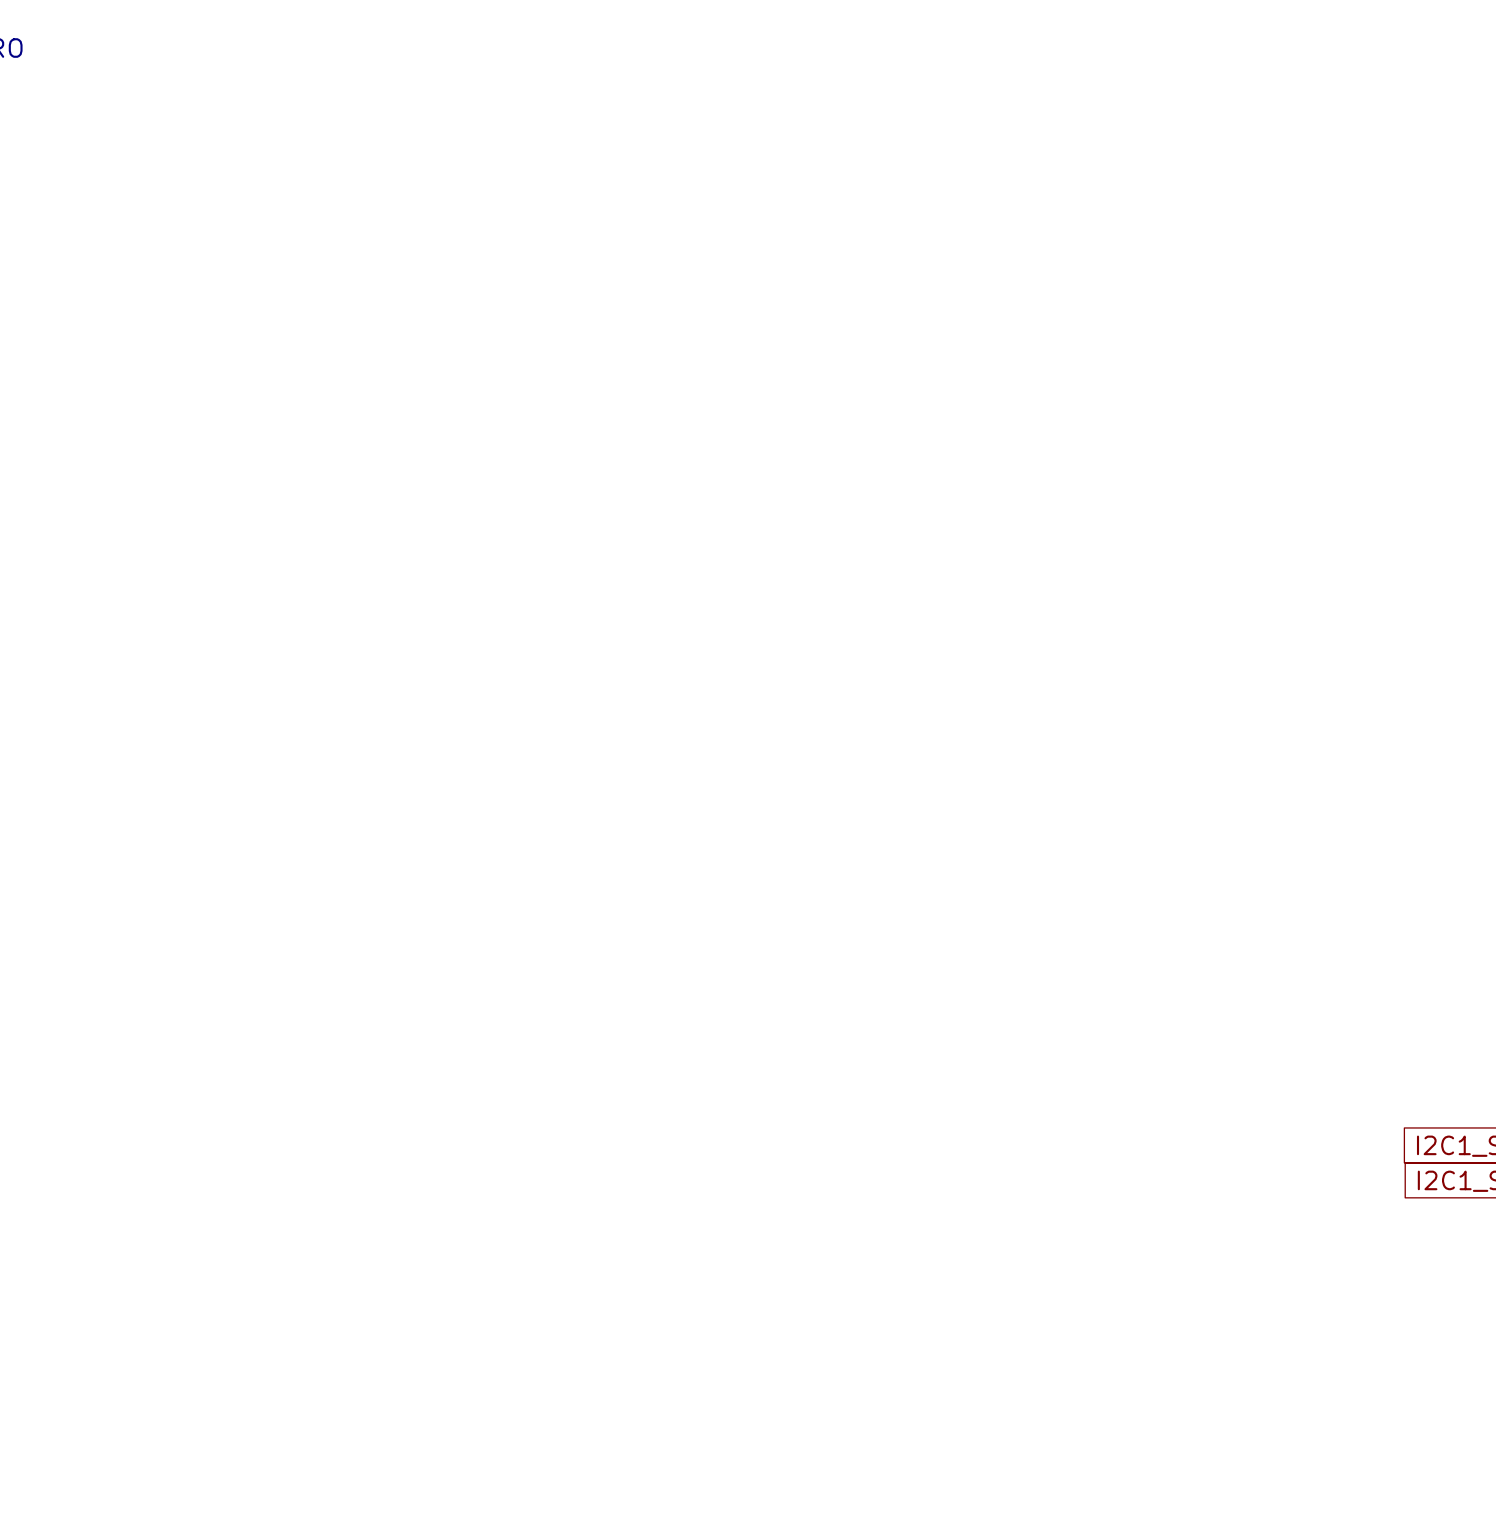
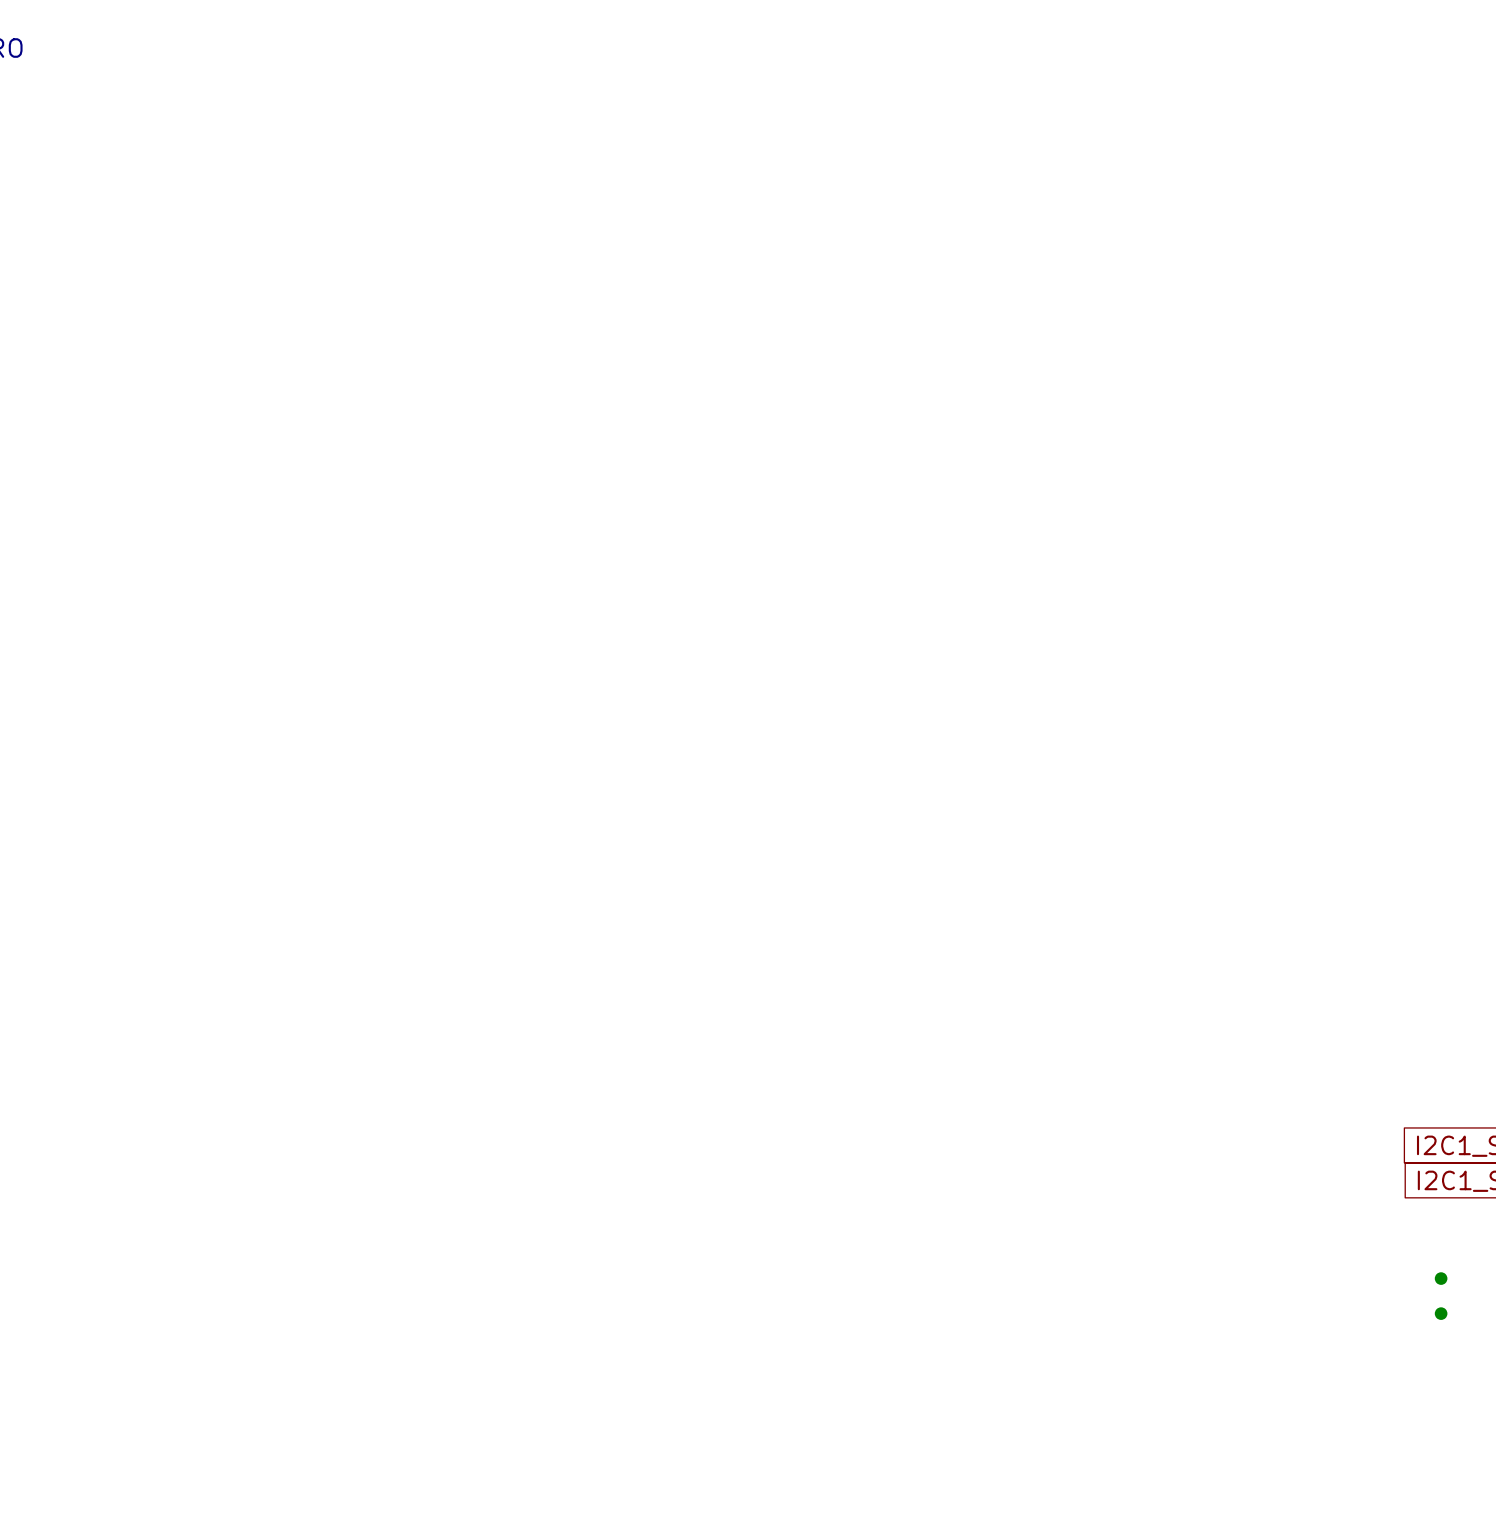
junction: none -> (1441, 1278)
junction: none -> (1441, 1313)

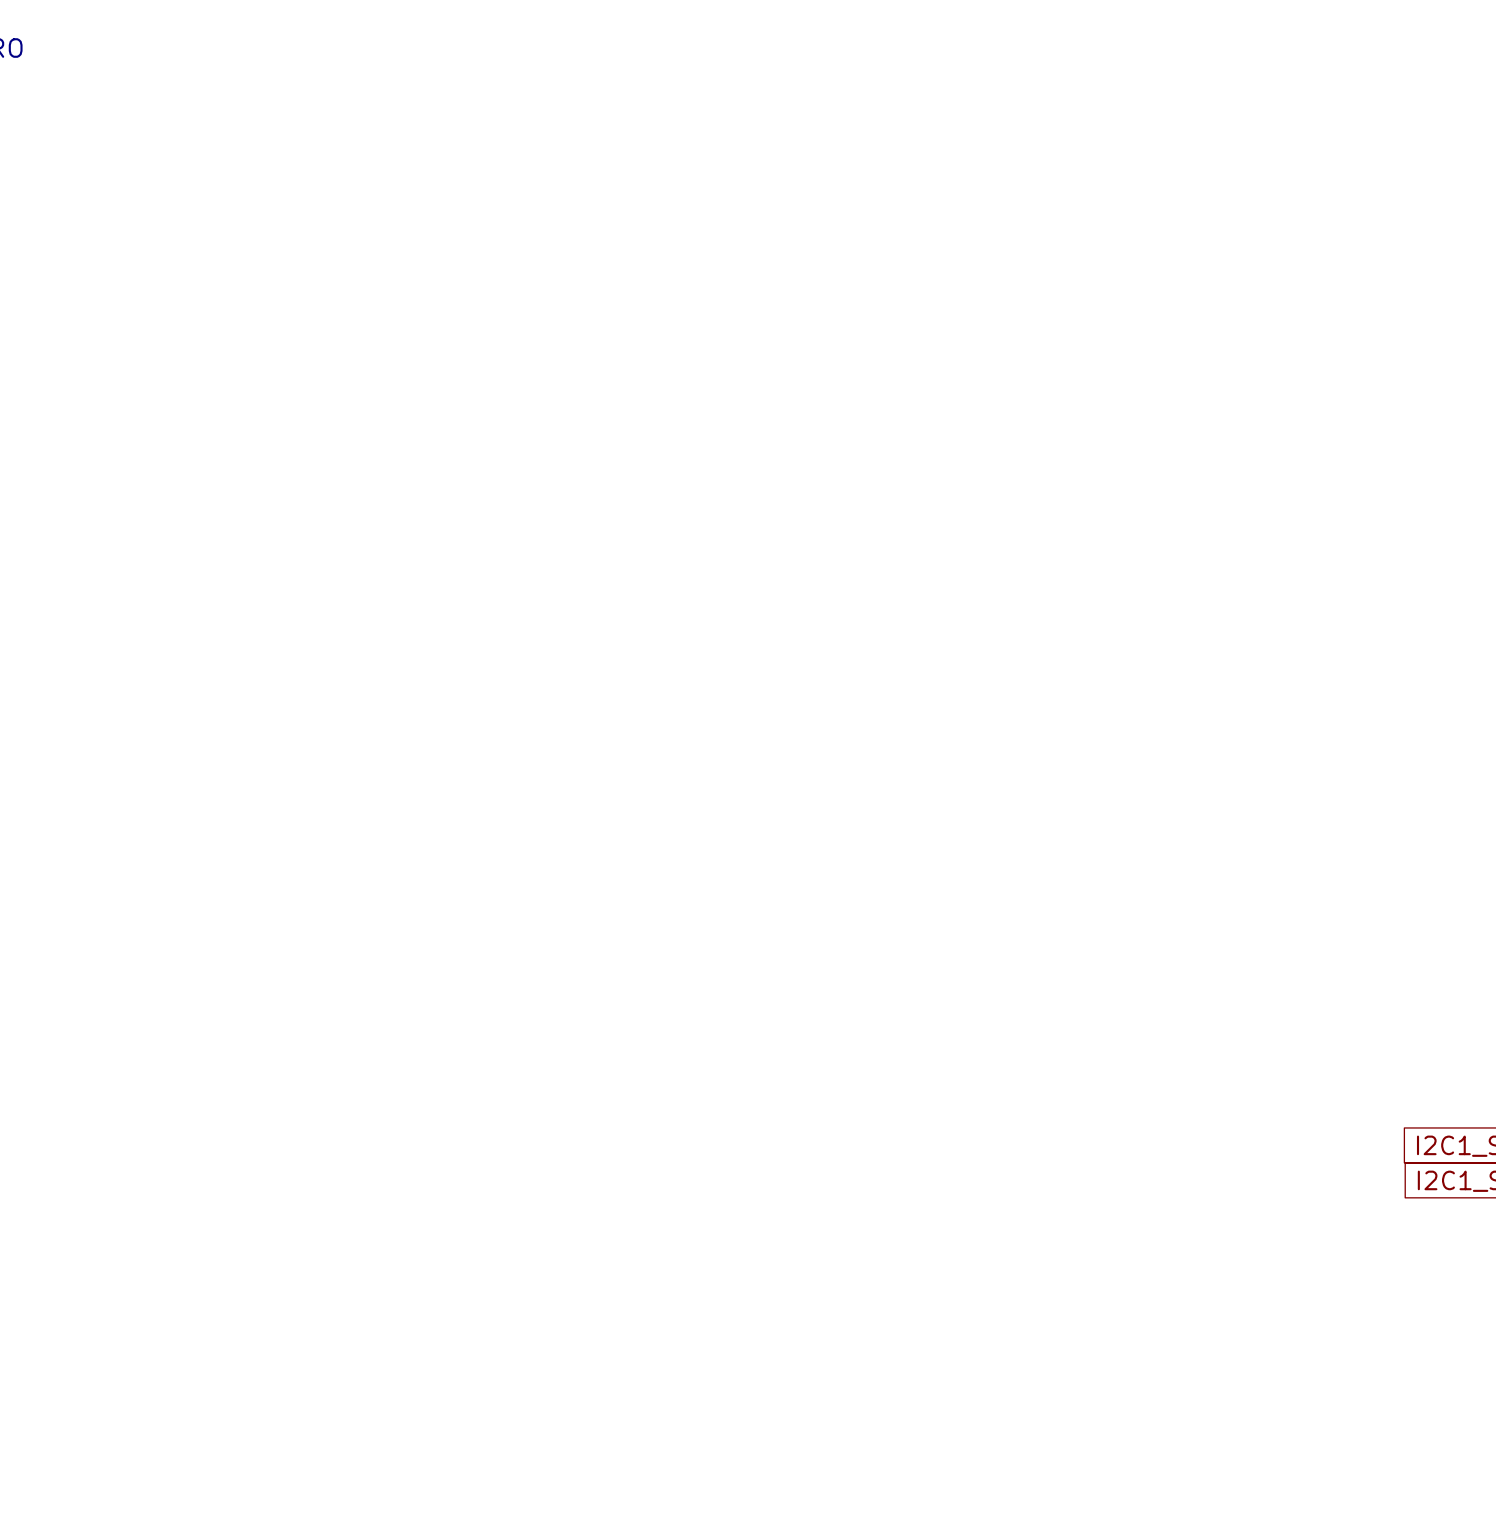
junction: (1441, 1278) -> none
junction: (1441, 1313) -> none

